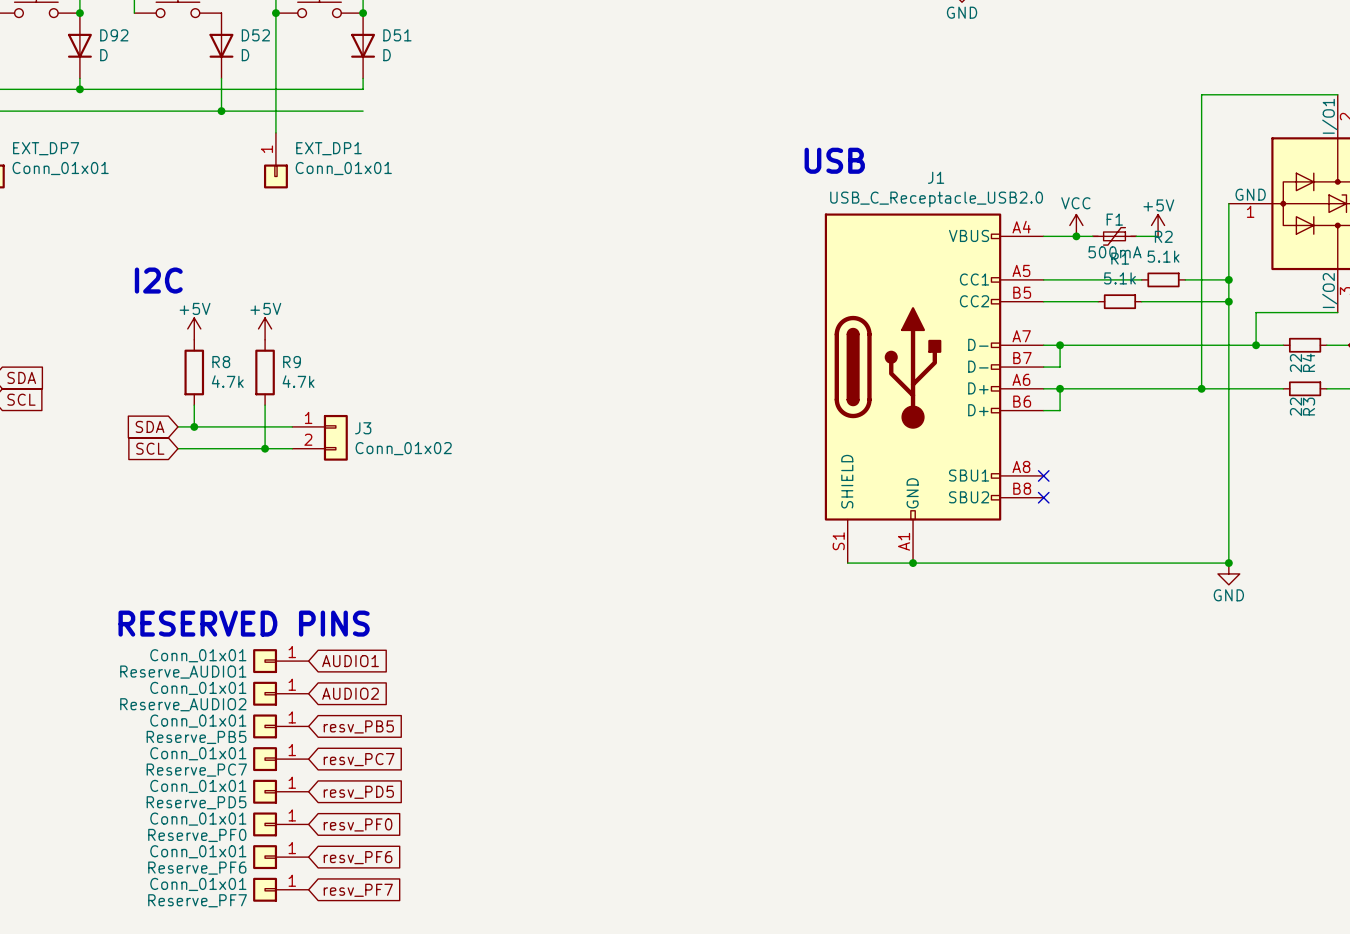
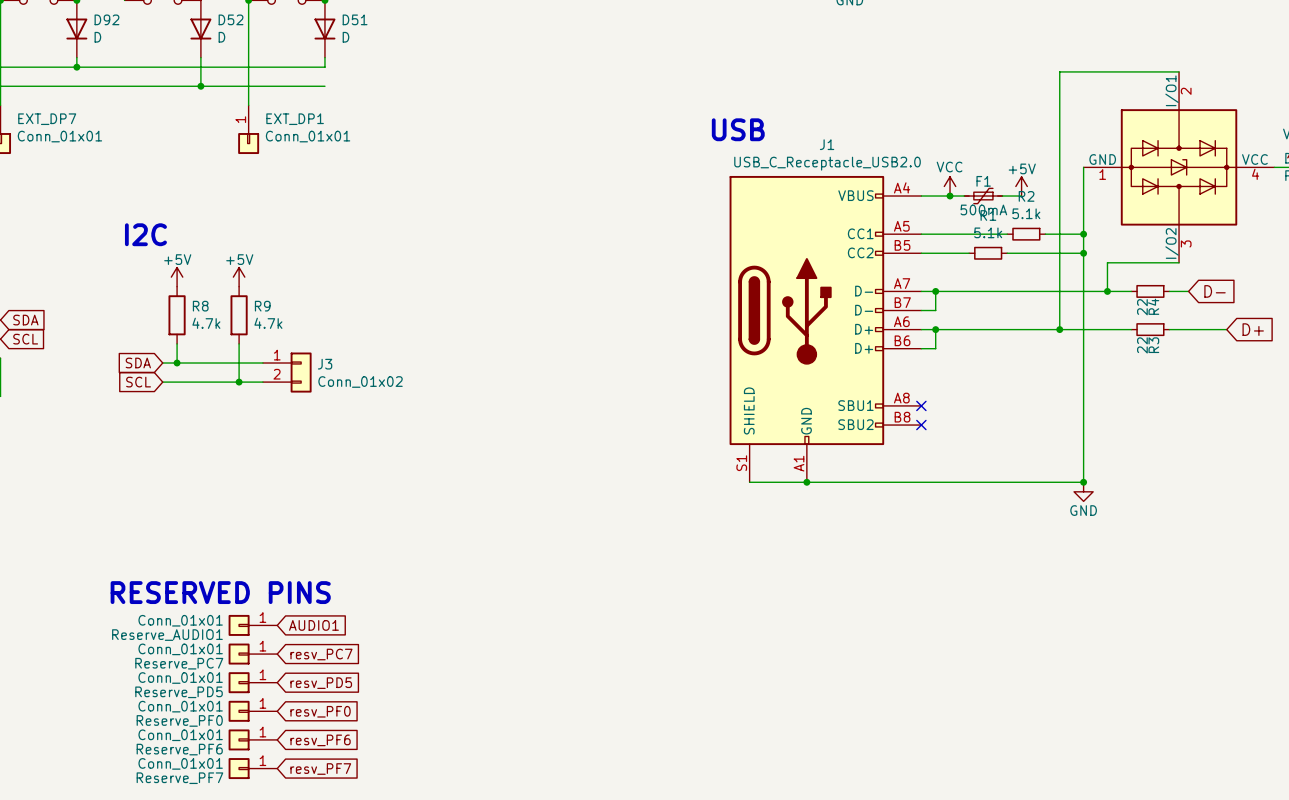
text position: RESERVED PINS (244, 623) -> RESERVED PINS (220, 592)
Reserve_AUDIO1: Conn_01x01 (280, 661) -> none
global label: AUDIO1 (350, 661) -> none
Reserve_AUDIO2: Conn_01x01 (280, 693) -> none
global label: AUDIO2 (350, 693) -> none
global label: resv_PB5 (358, 726) -> AUDIO1 (313, 625)
Reserve_PB5 name: Reserve_PB5 (196, 737) -> Reserve_AUDIO1 (167, 635)

